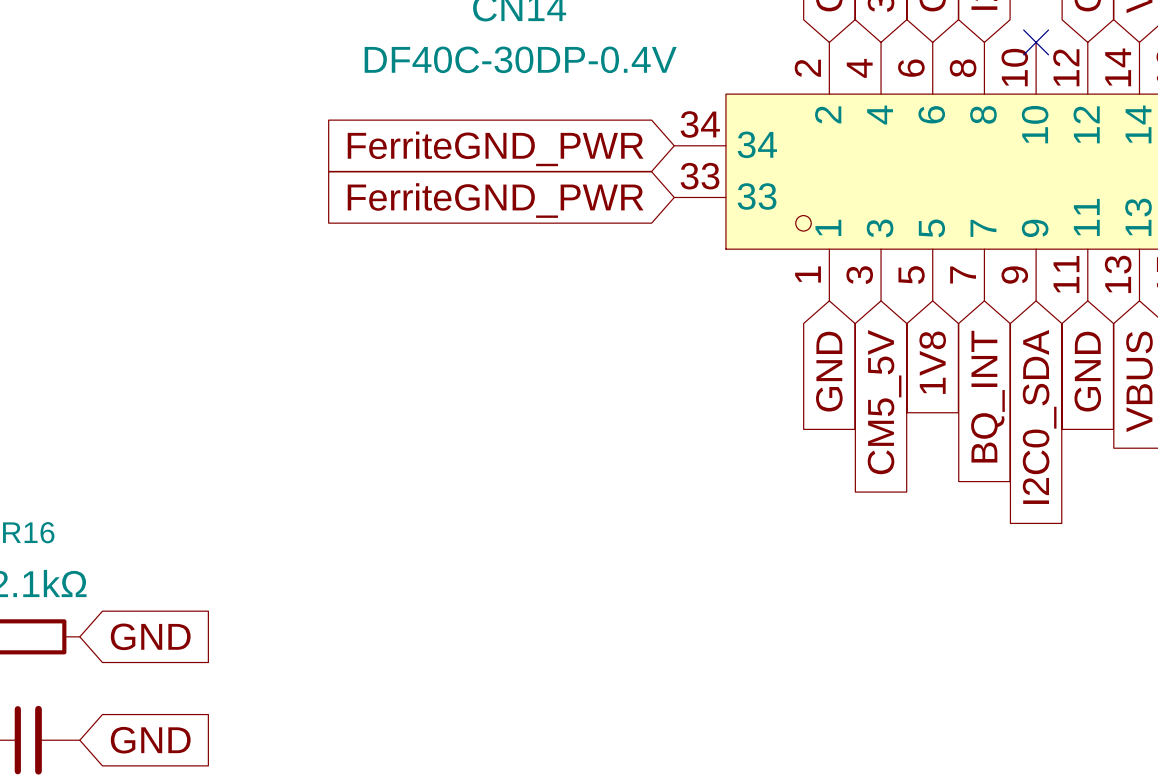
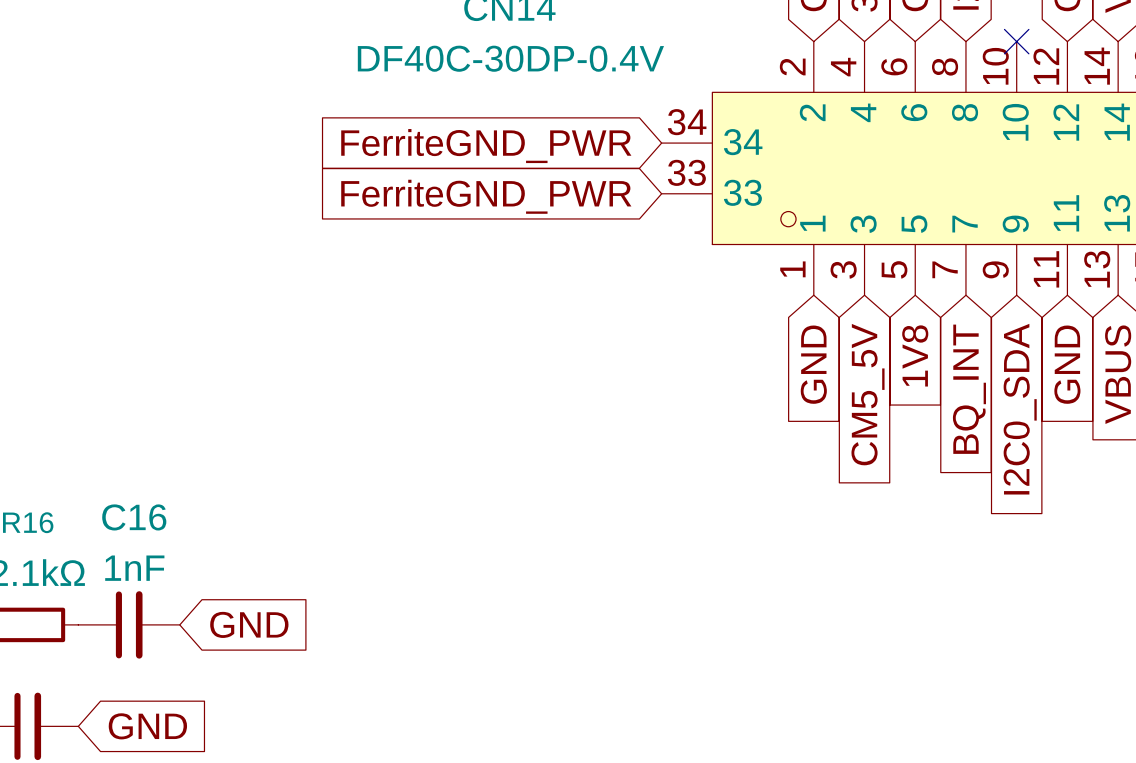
C16: none -> 1nF (129, 624)
global label position: GND (150, 636) -> GND (249, 624)

